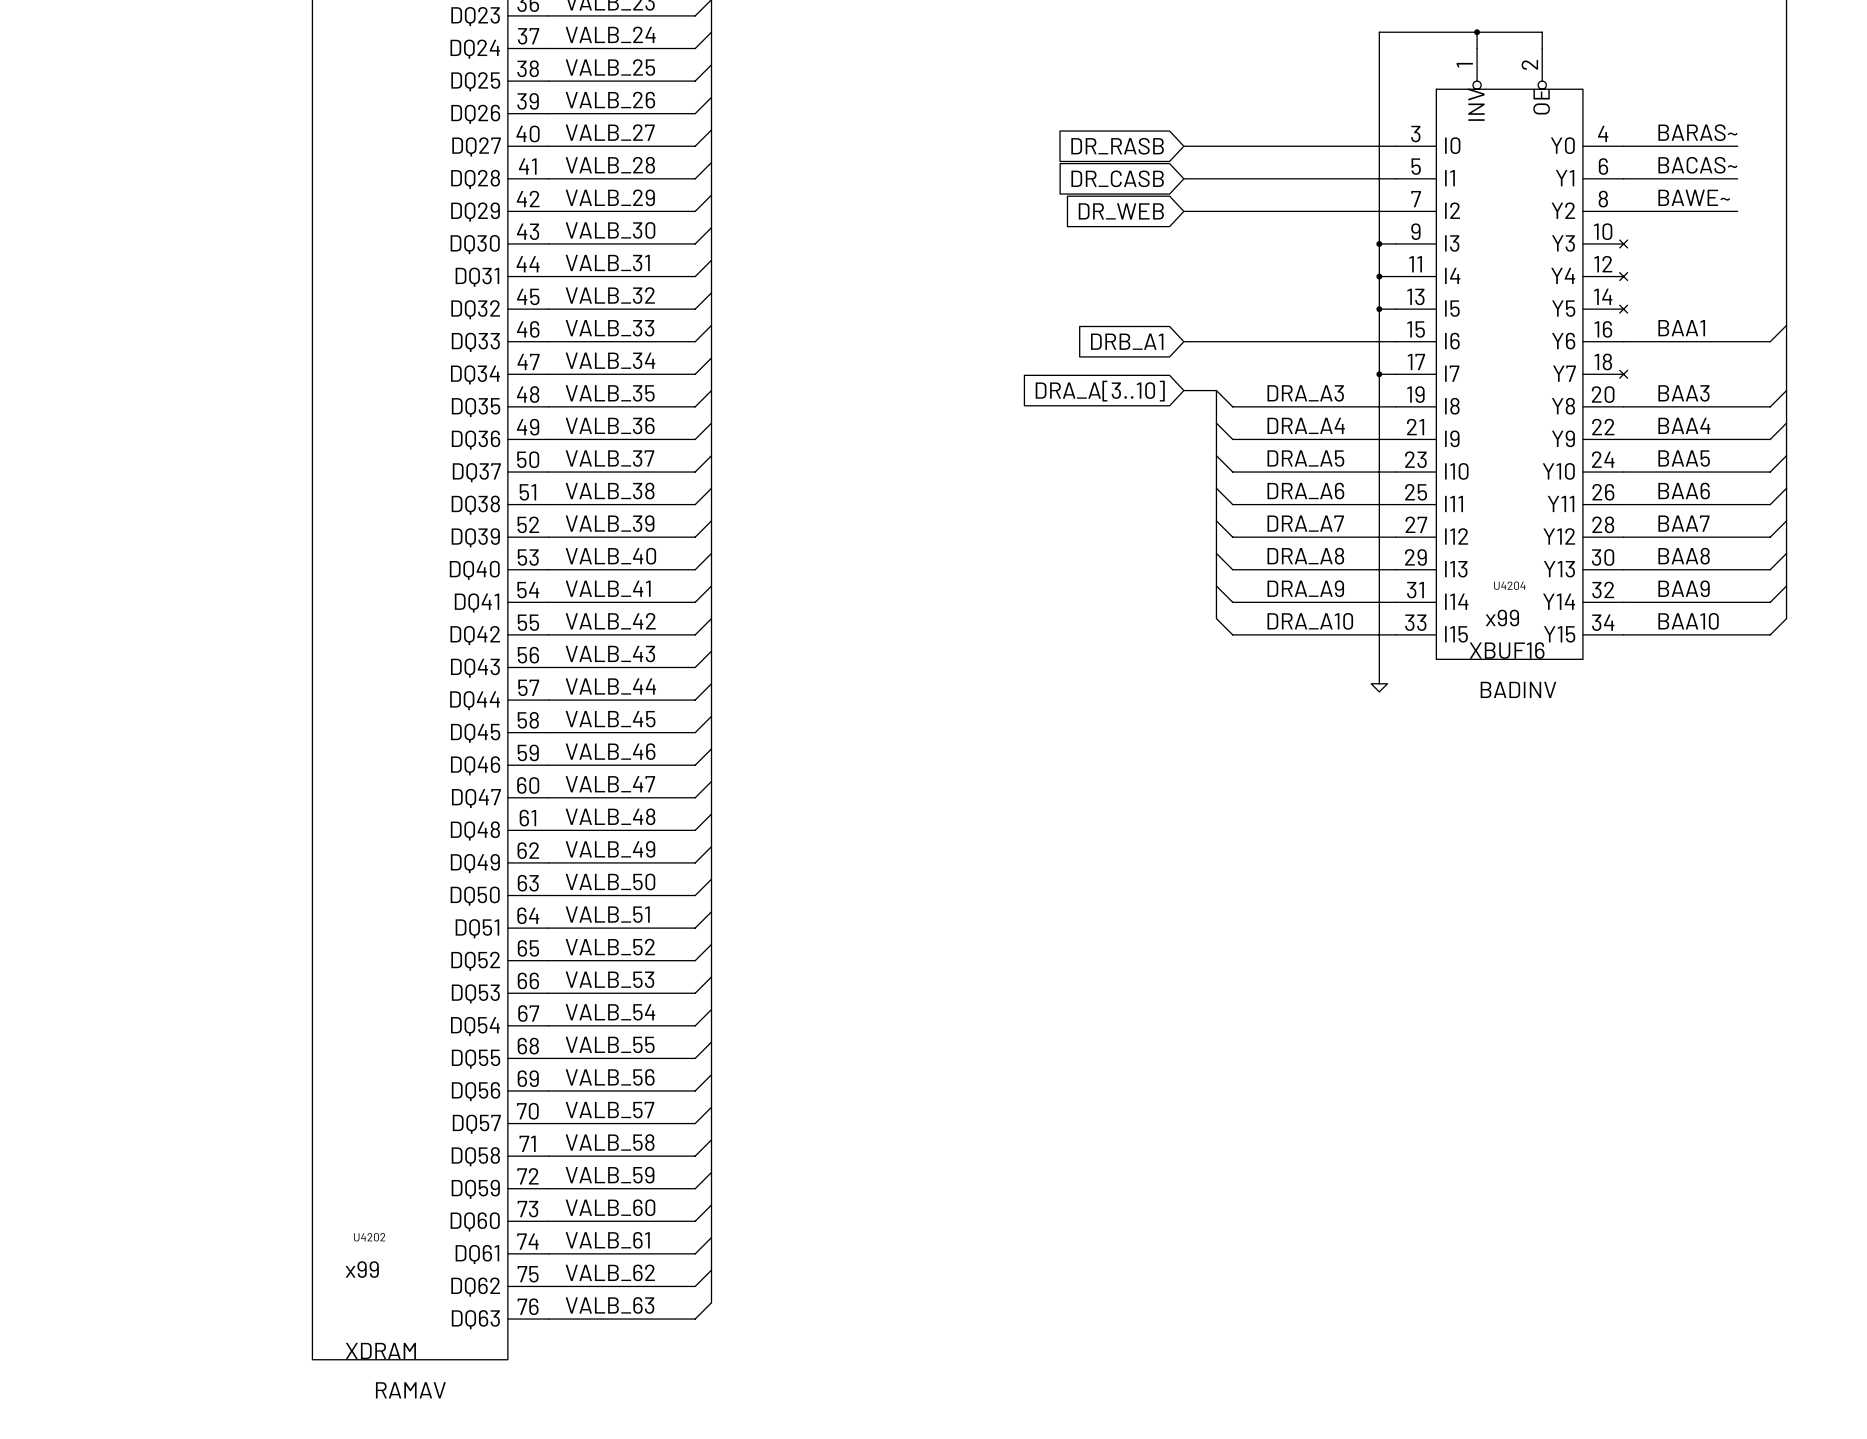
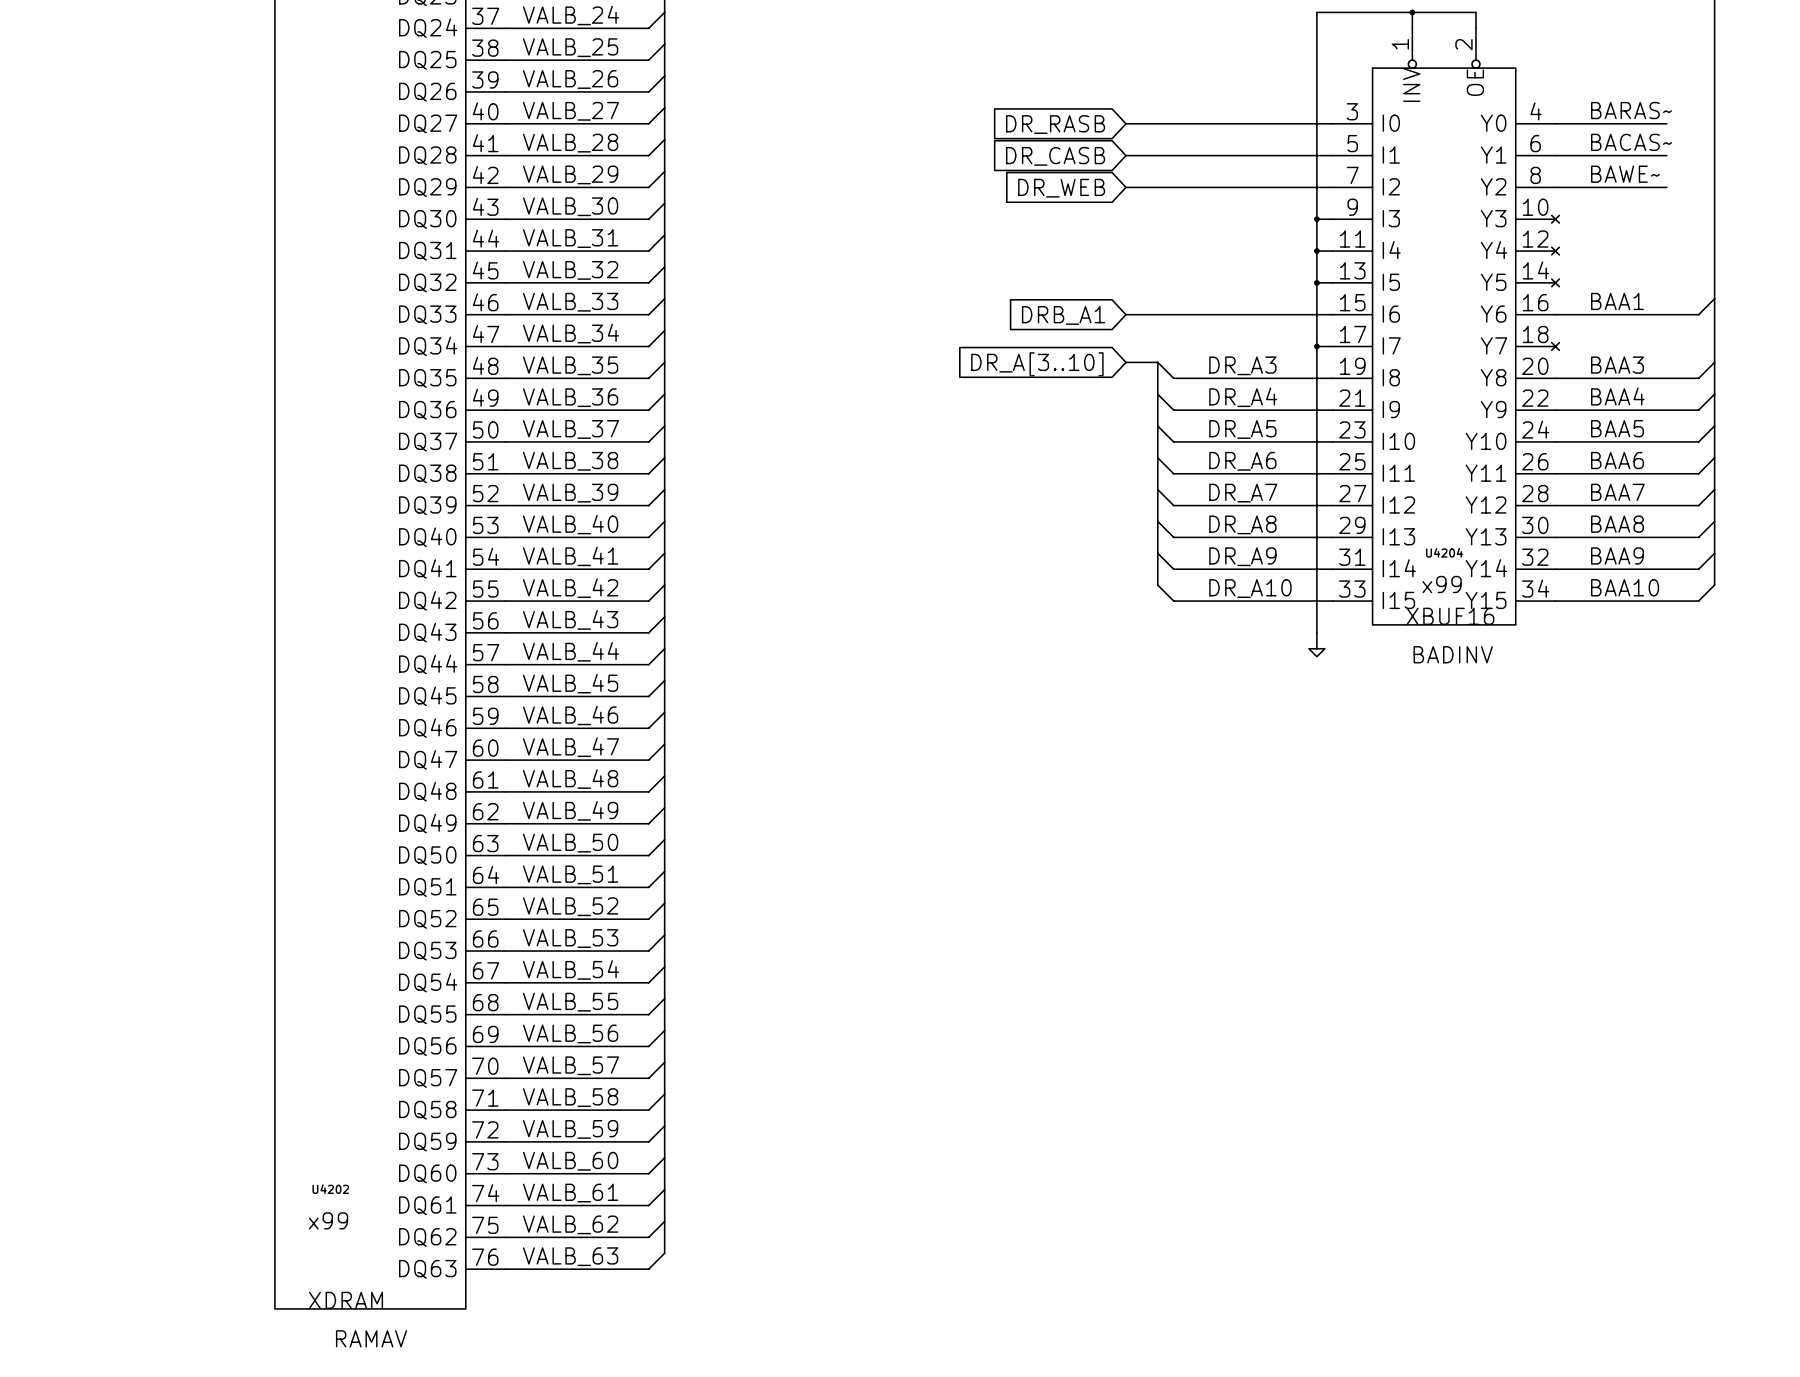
global label: DRA_A[3..10] (1100, 391) -> DR_A[3..10] (1037, 364)
label: DRA_A3 (1305, 393) -> DR_A3 (1242, 365)
label: DRA_A4 (1306, 425) -> DR_A4 (1243, 397)
label: DRA_A5 (1305, 458) -> DR_A5 (1242, 429)
label: DRA_A6 (1305, 491) -> DR_A6 (1242, 461)
label: DRA_A7 (1305, 523) -> DR_A7 (1243, 493)
label: DRA_A8 (1305, 556) -> DR_A8 (1242, 524)
label: DRA_A9 (1305, 588) -> DR_A9 (1242, 556)
label: DRA_A10 (1310, 621) -> DR_A10 (1250, 588)

